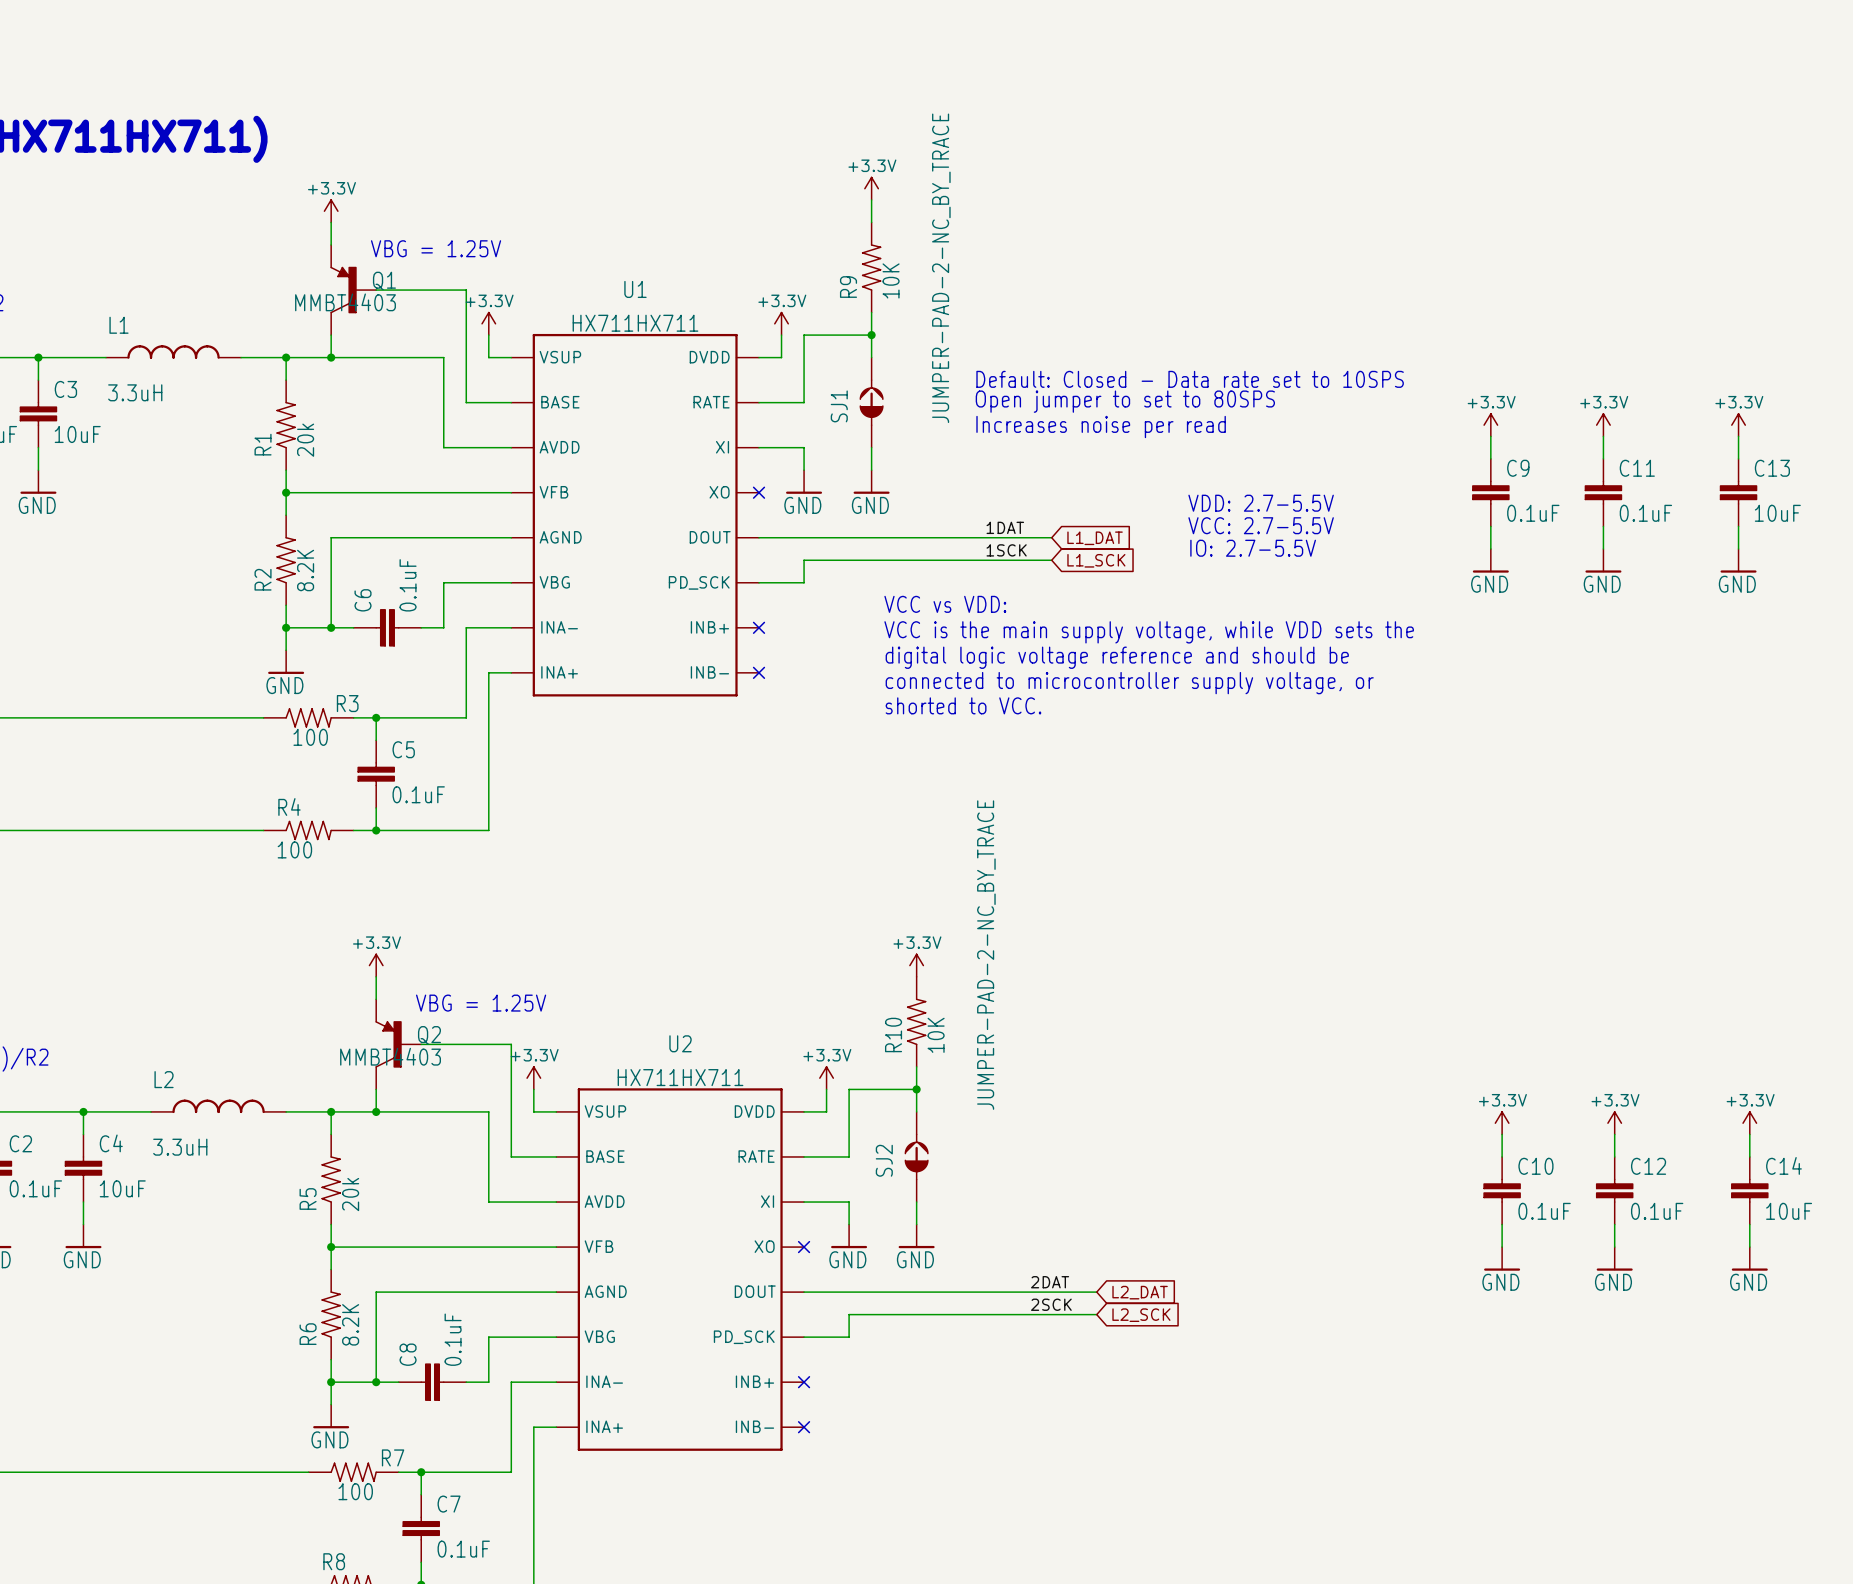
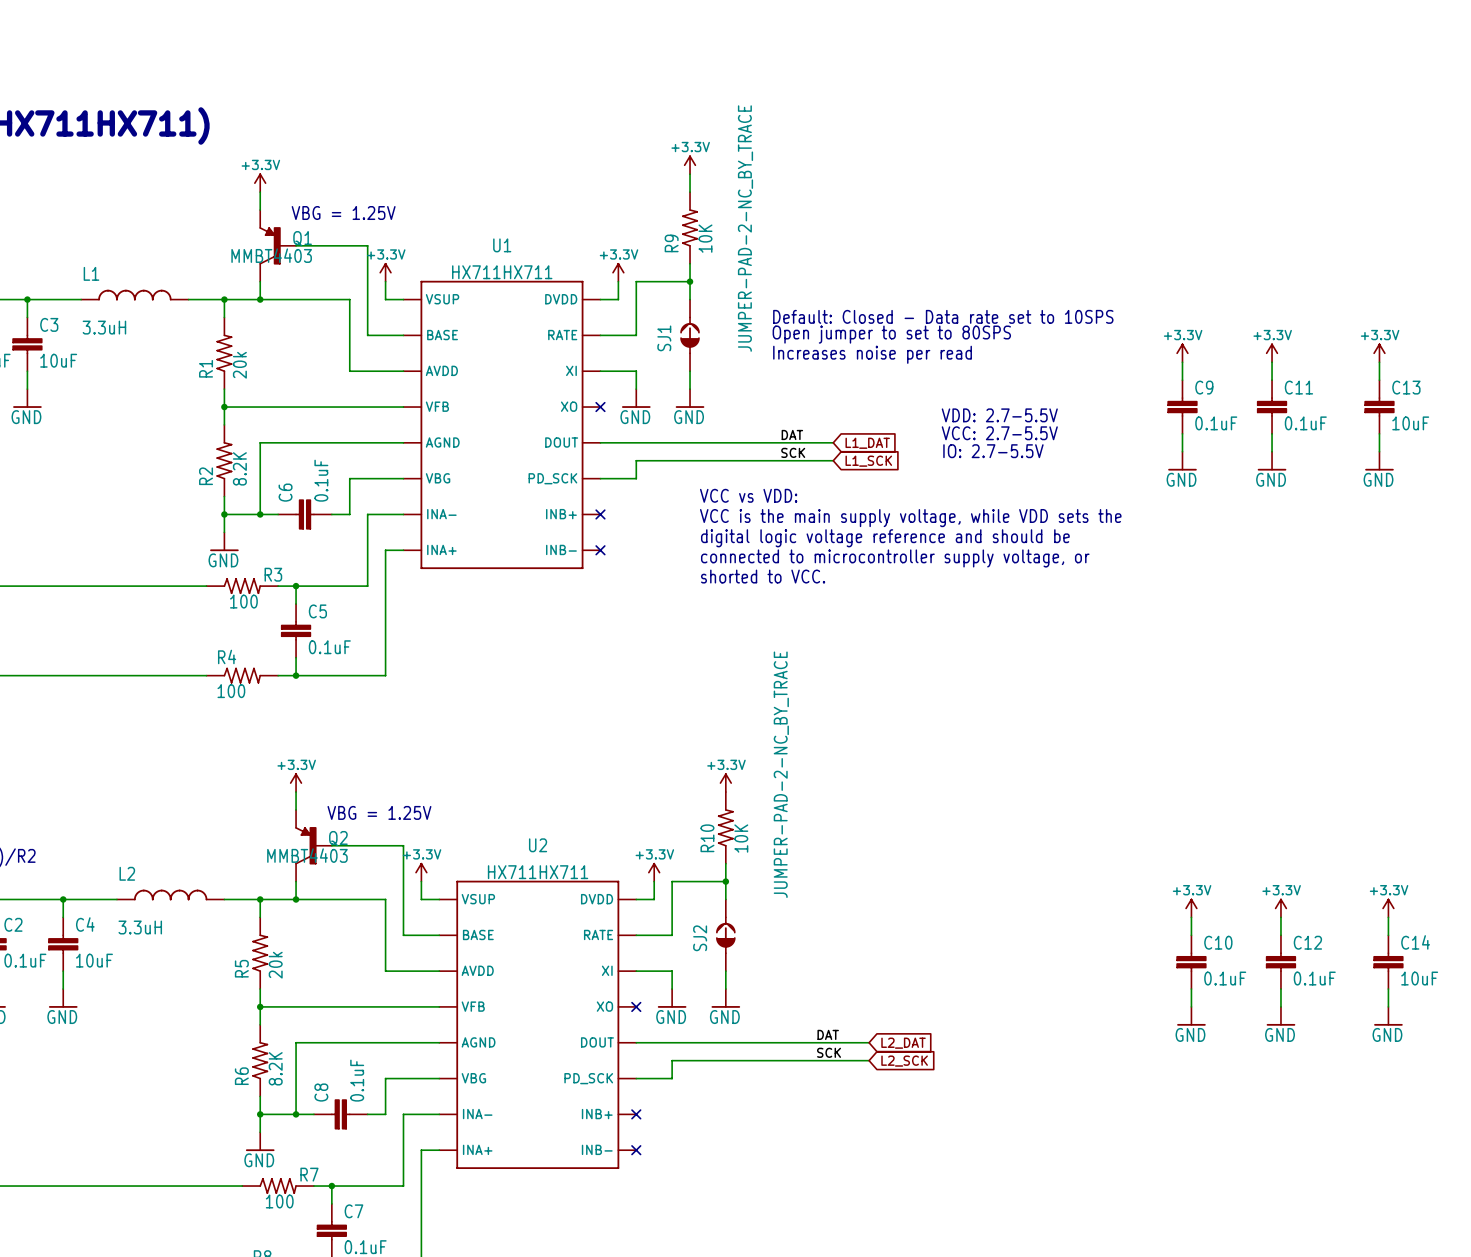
label: 1DAT (1005, 527) -> DAT (792, 434)
label: 1SCK (1006, 550) -> SCK (793, 452)
label: 2DAT (1050, 1282) -> DAT (828, 1034)
label: 2SCK (1051, 1304) -> SCK (829, 1052)

